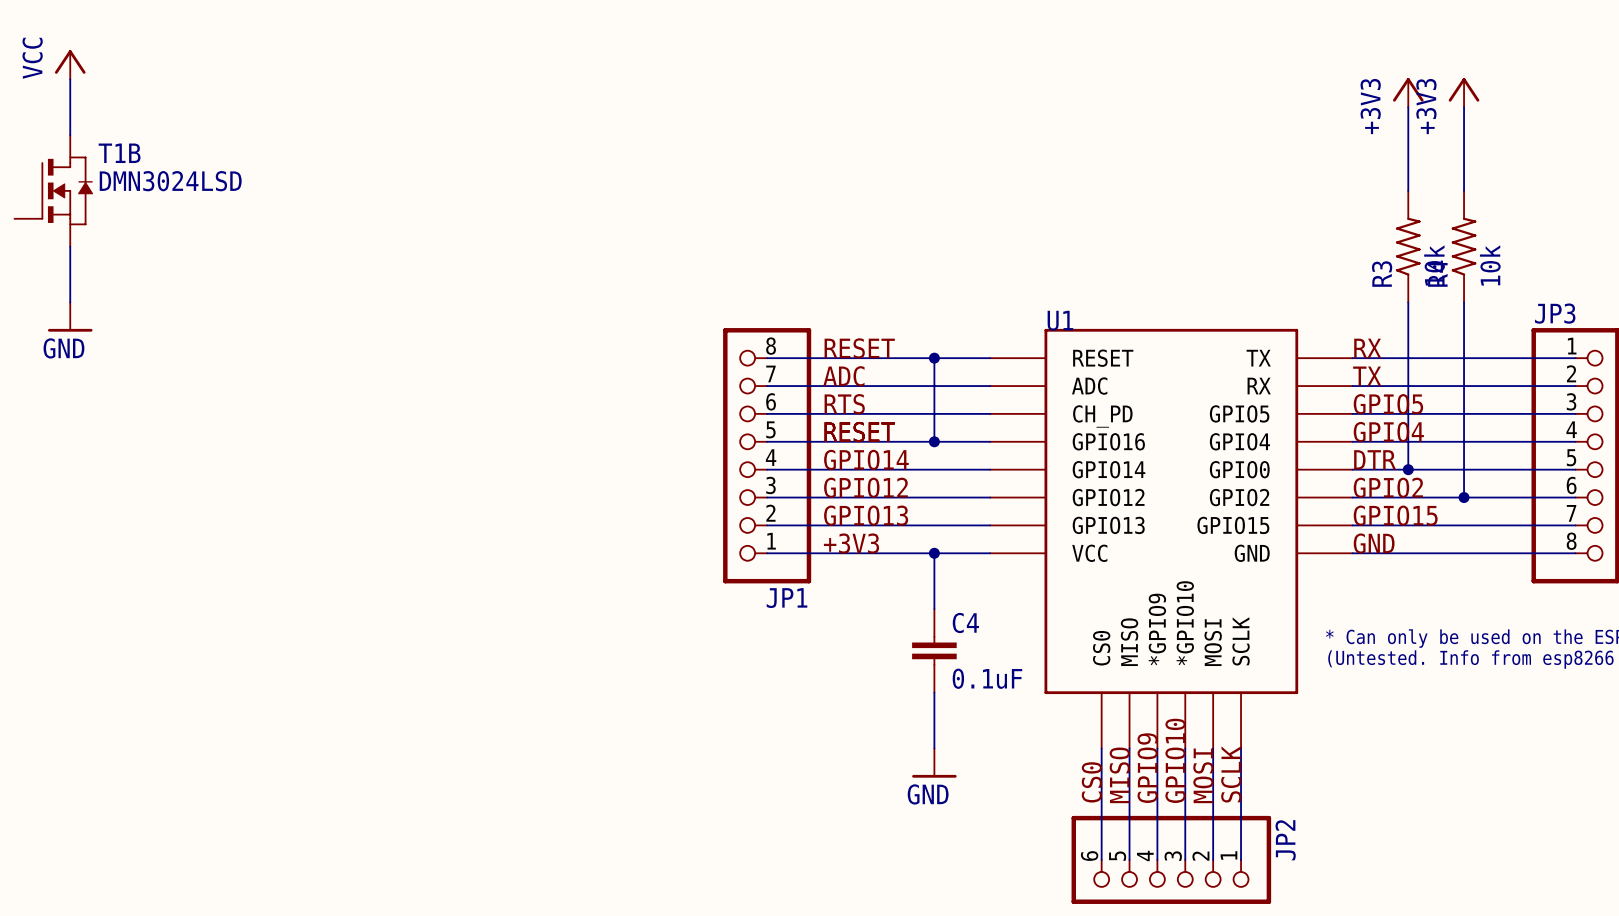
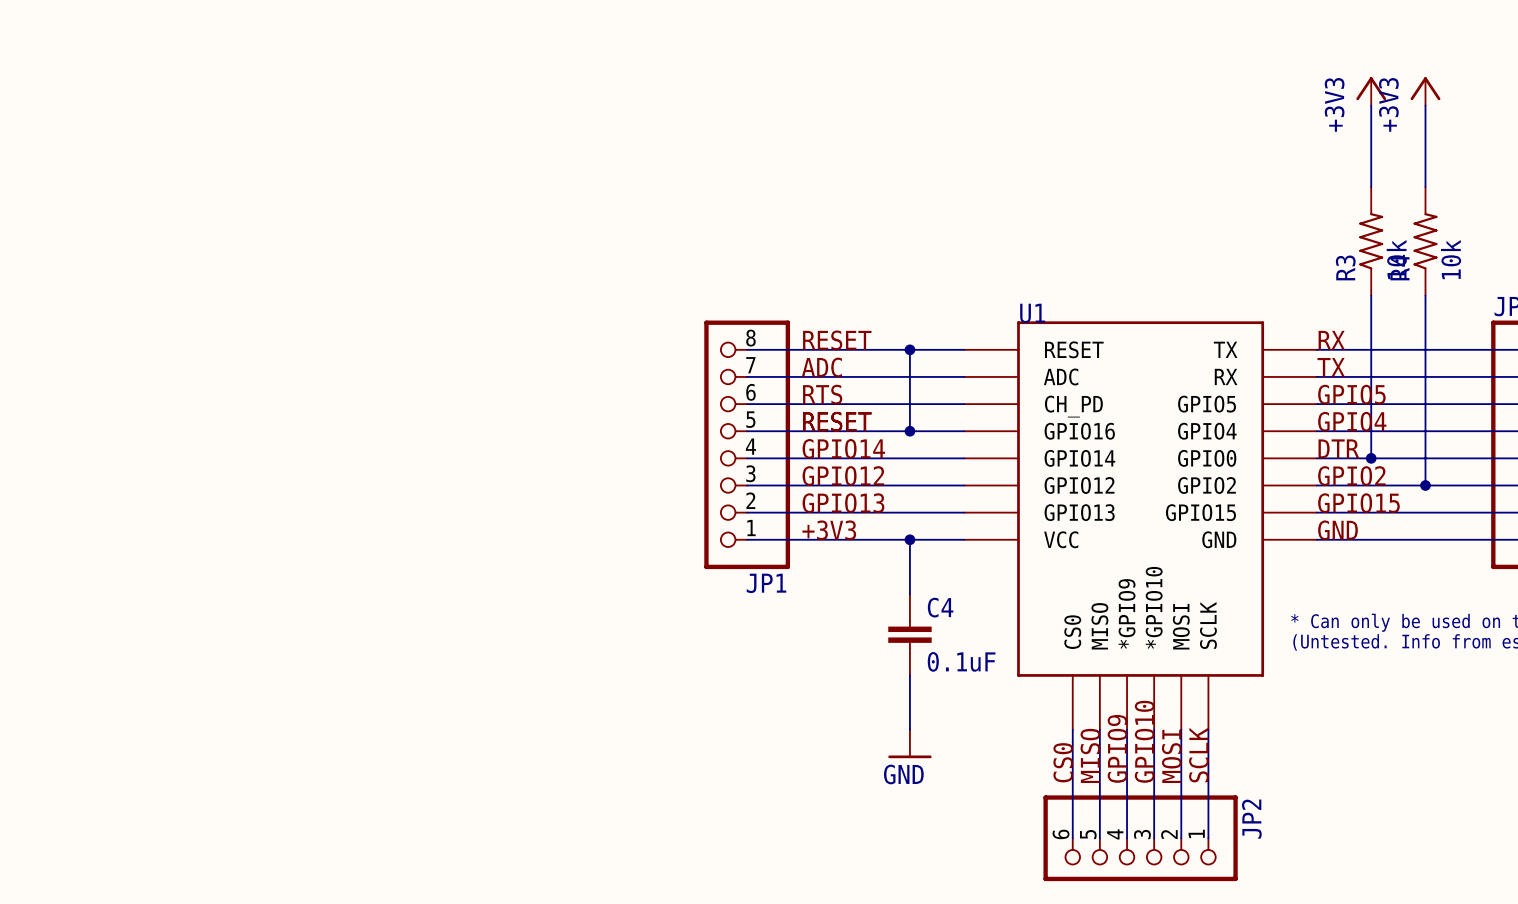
power symbol: VCC (70, 64) -> none
wire: (70, 79) (70, 135) -> none
T1B: DMN3024LSD (53, 190) -> none
wire: (70, 246) (70, 302) -> none
power symbol: GND (70, 317) -> none

